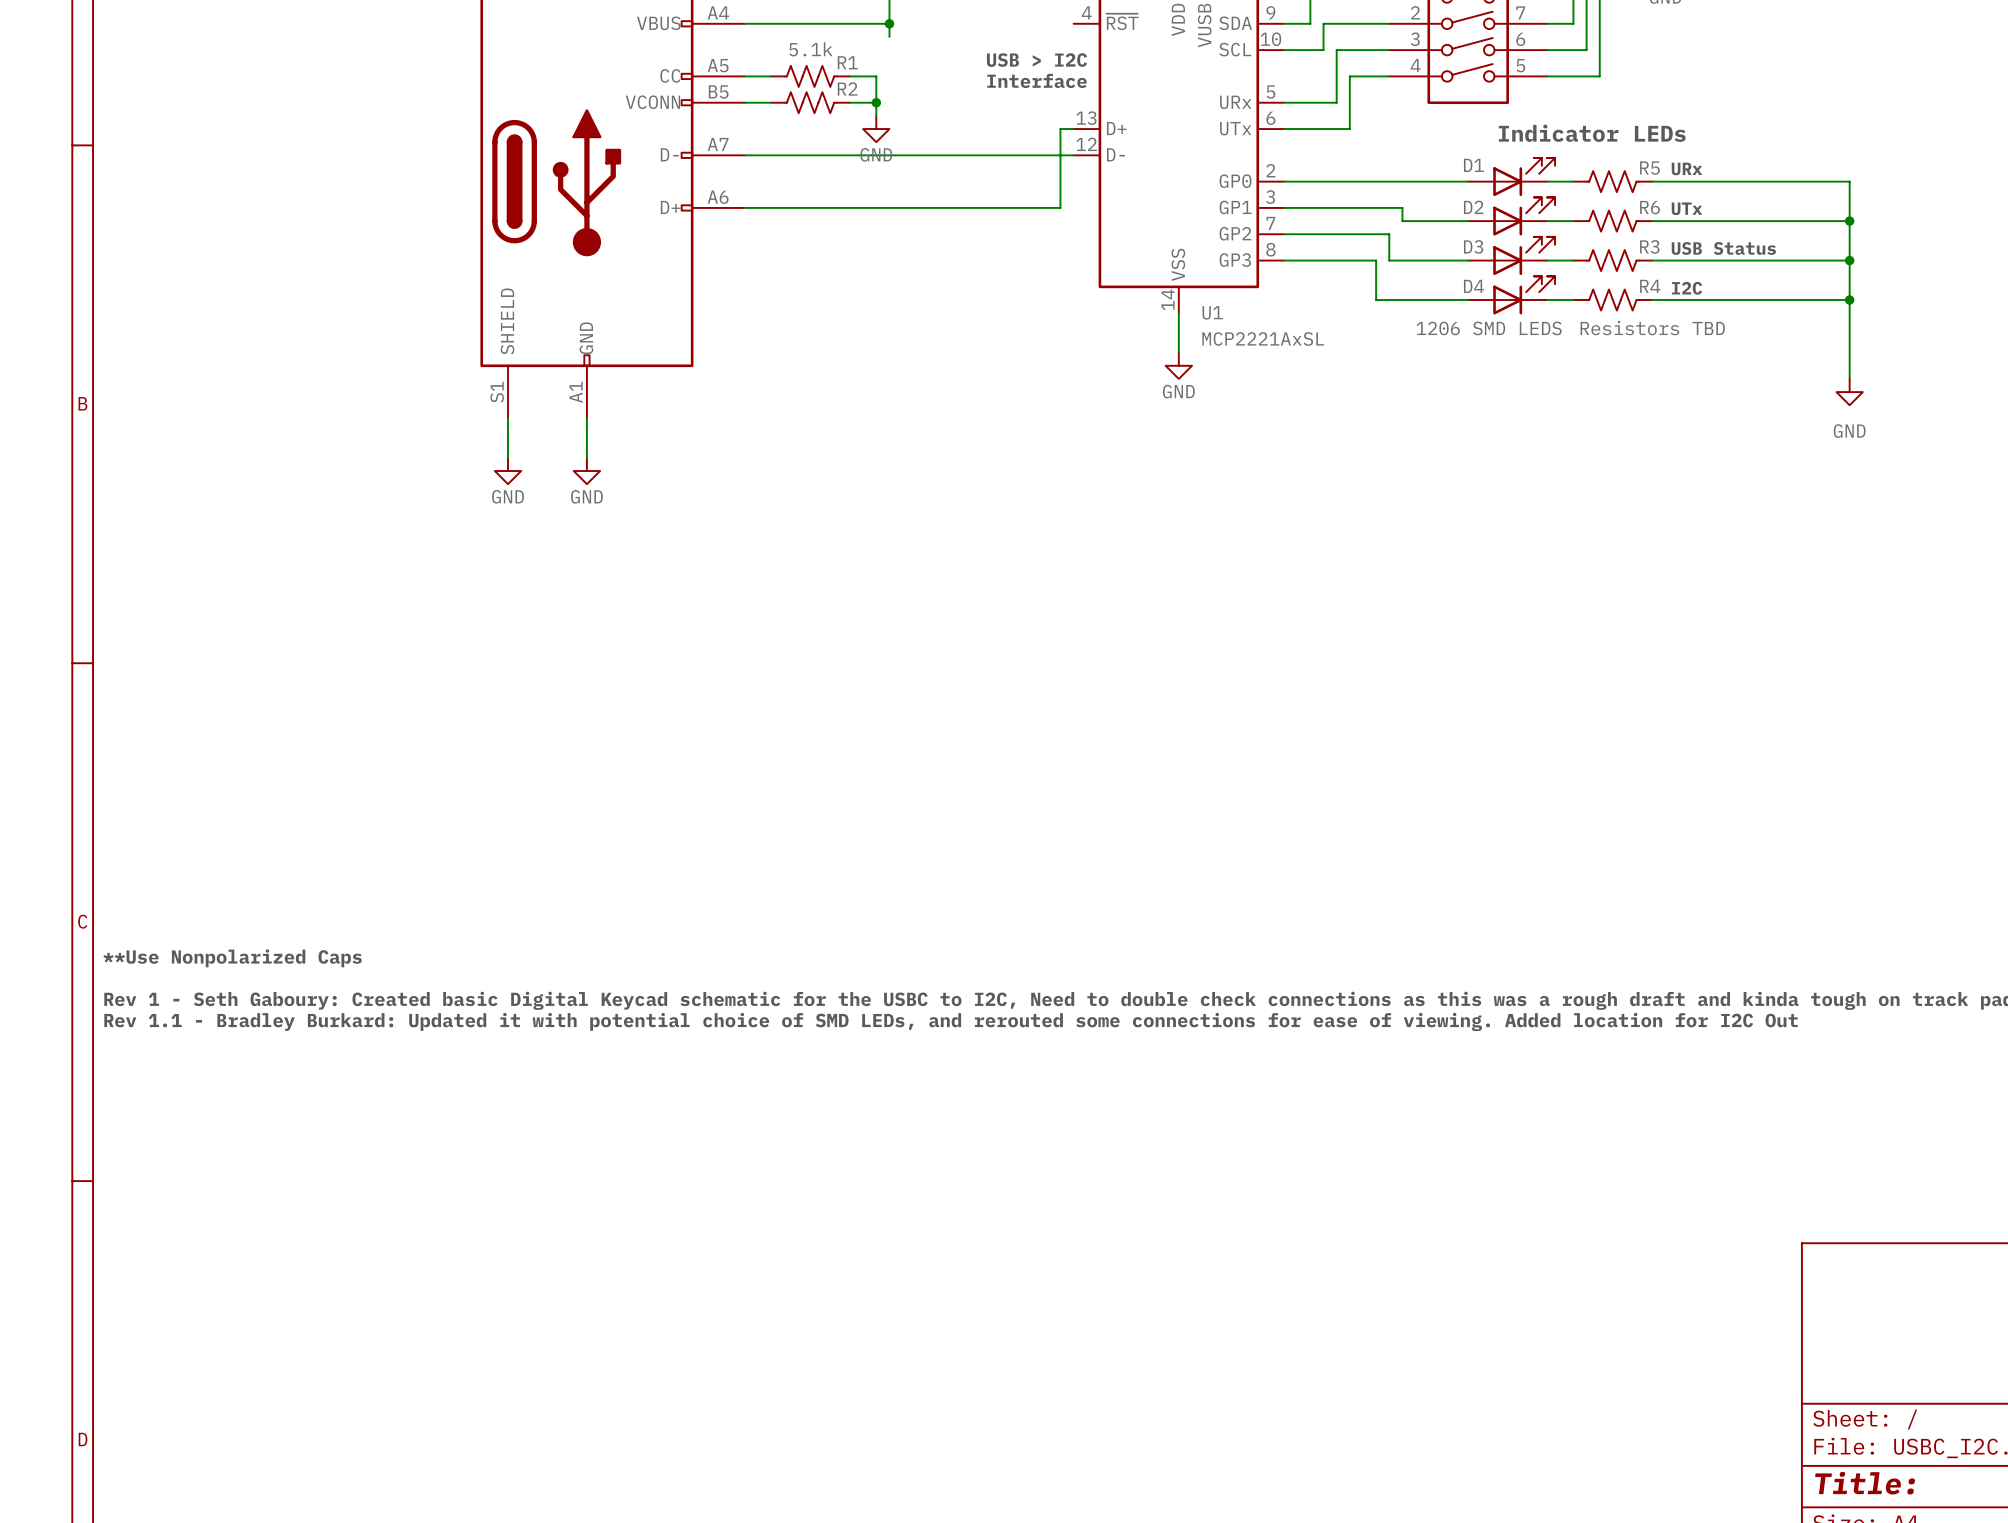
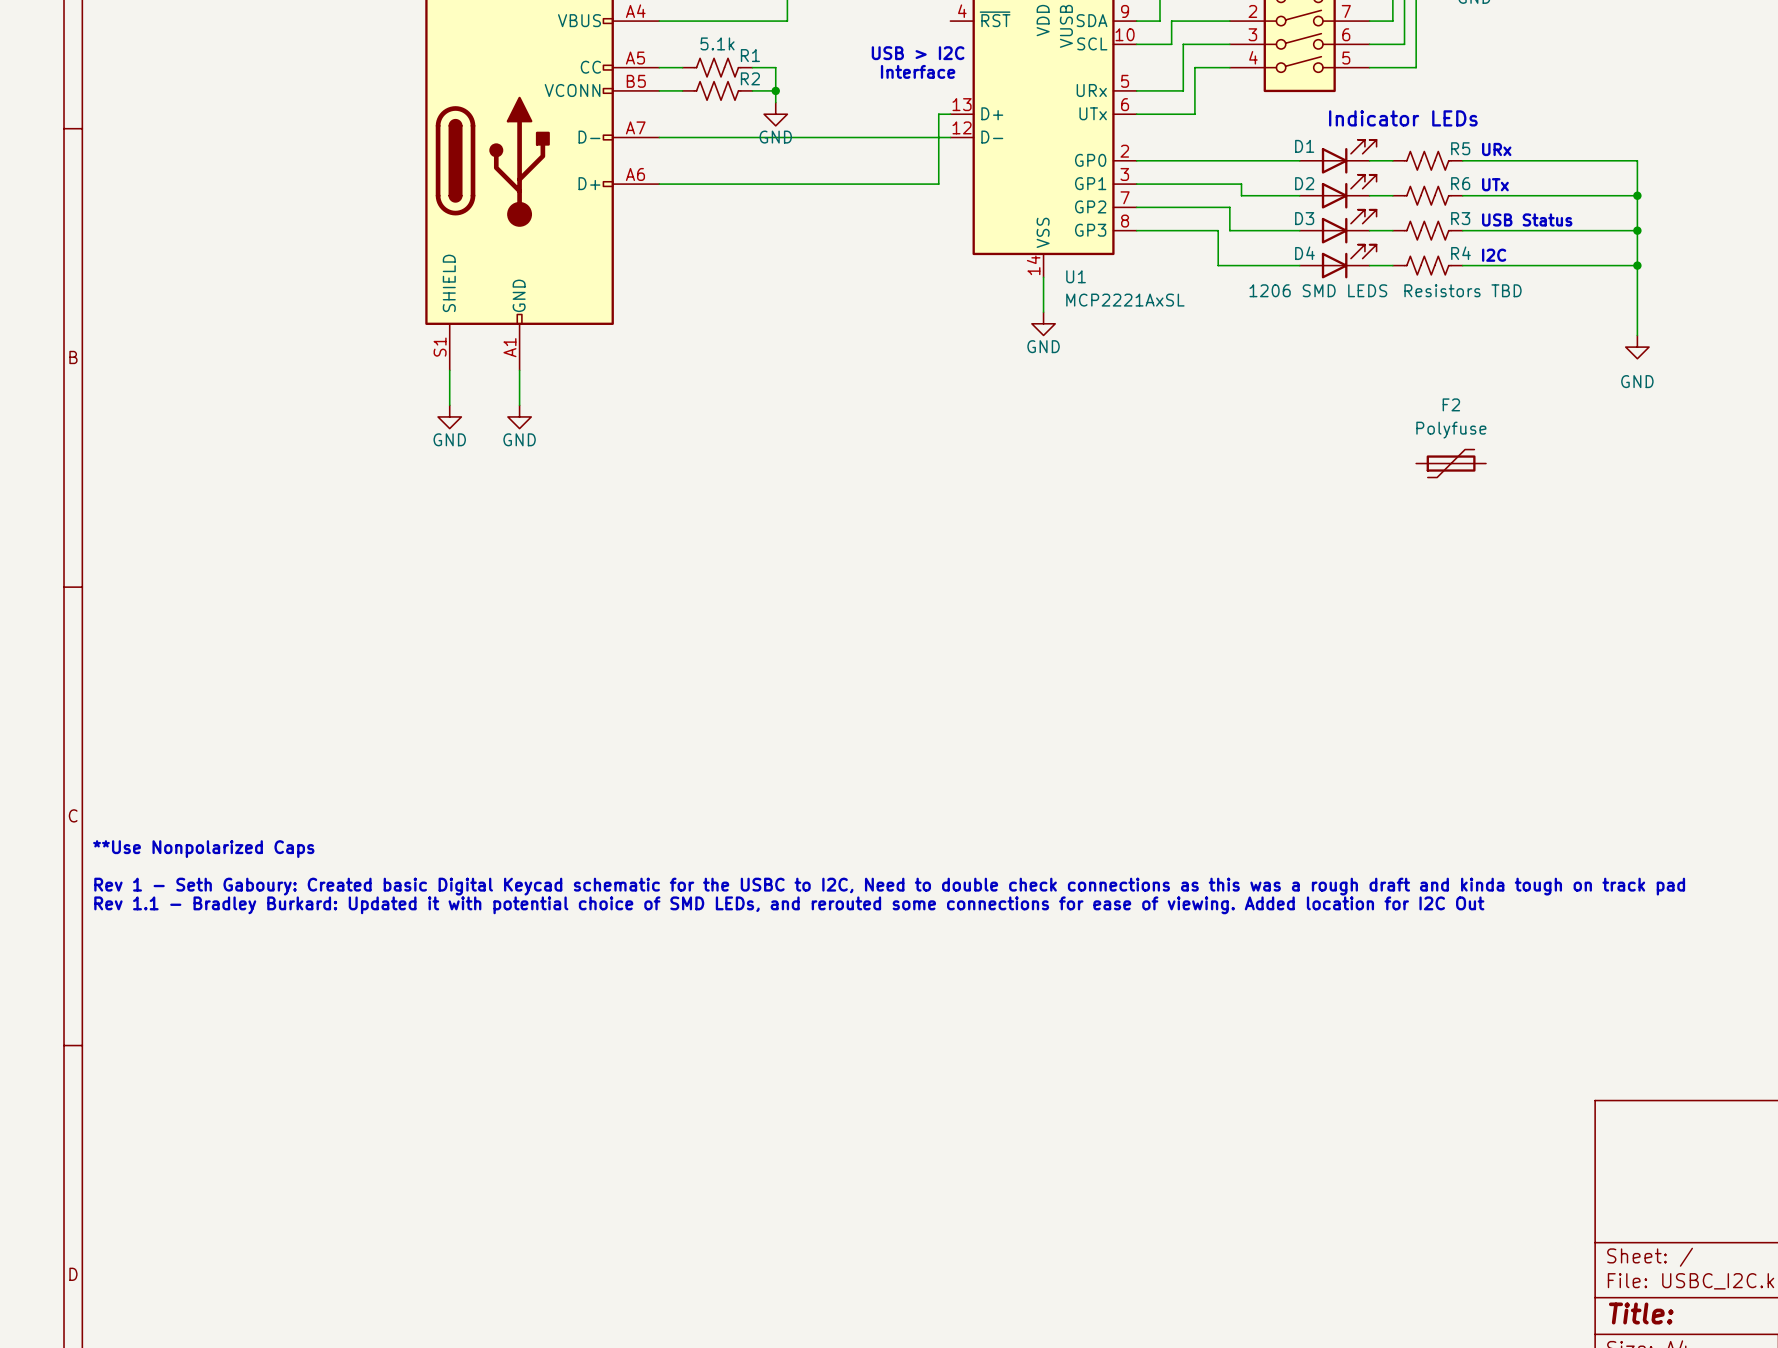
wire: (889, 23) (889, 36) -> none
junction: (889, 23) -> none
F2: none -> Polyfuse (1451, 463)

